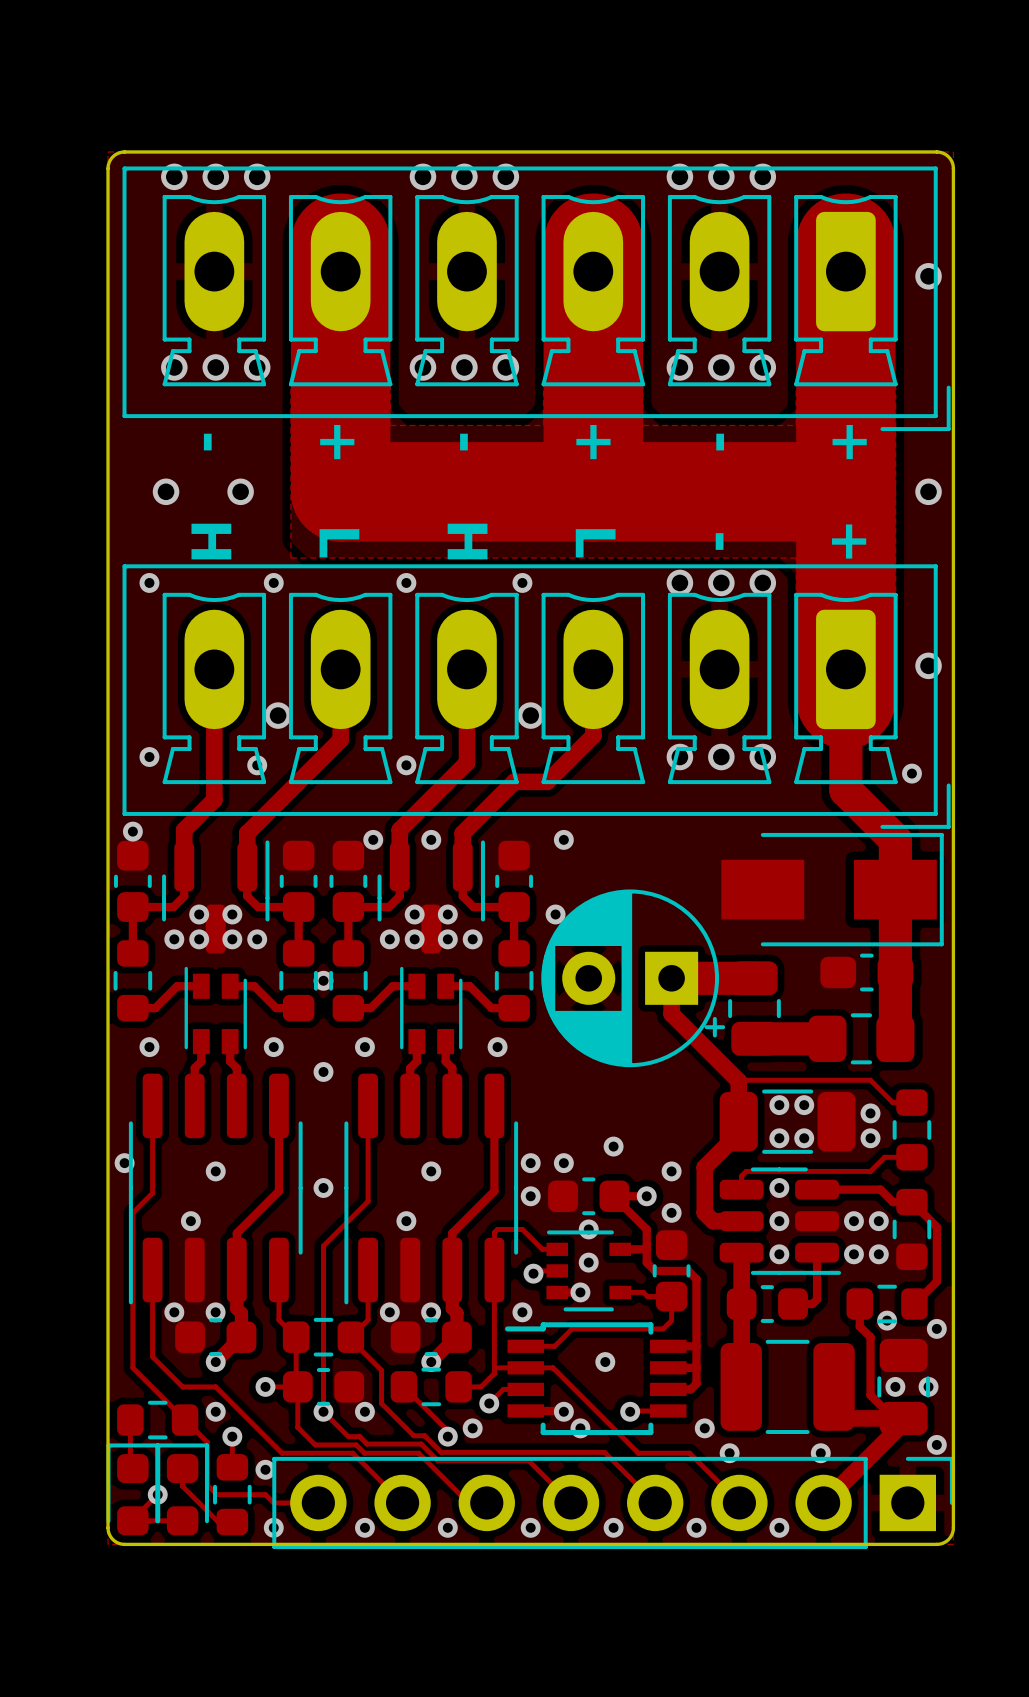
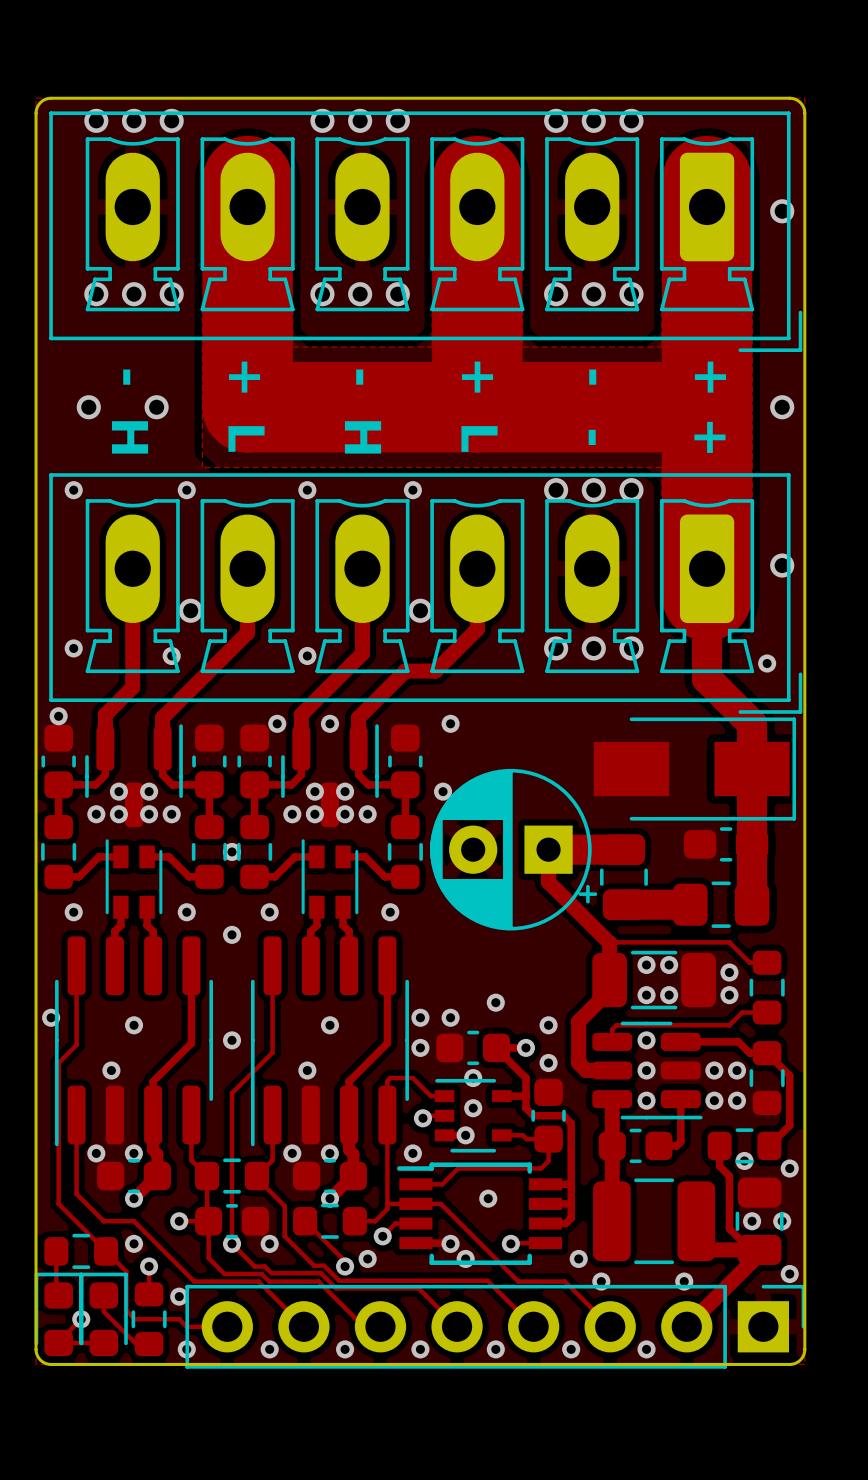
text position: - (207, 442) -> - (126, 377)
text position: + (337, 442) -> + (244, 377)
text position: - (463, 442) -> - (359, 377)
text position: + (593, 442) -> + (477, 377)
text position: - (720, 442) -> - (592, 377)
text position: + (849, 442) -> + (710, 377)
text position: H (211, 541) -> H (130, 437)
text position: H (467, 541) -> H (363, 437)
text position: - (719, 541) -> - (592, 437)
text position: + (849, 541) -> + (709, 437)
text position: L (339, 543) -> L (246, 439)
text position: L (595, 543) -> L (479, 439)

